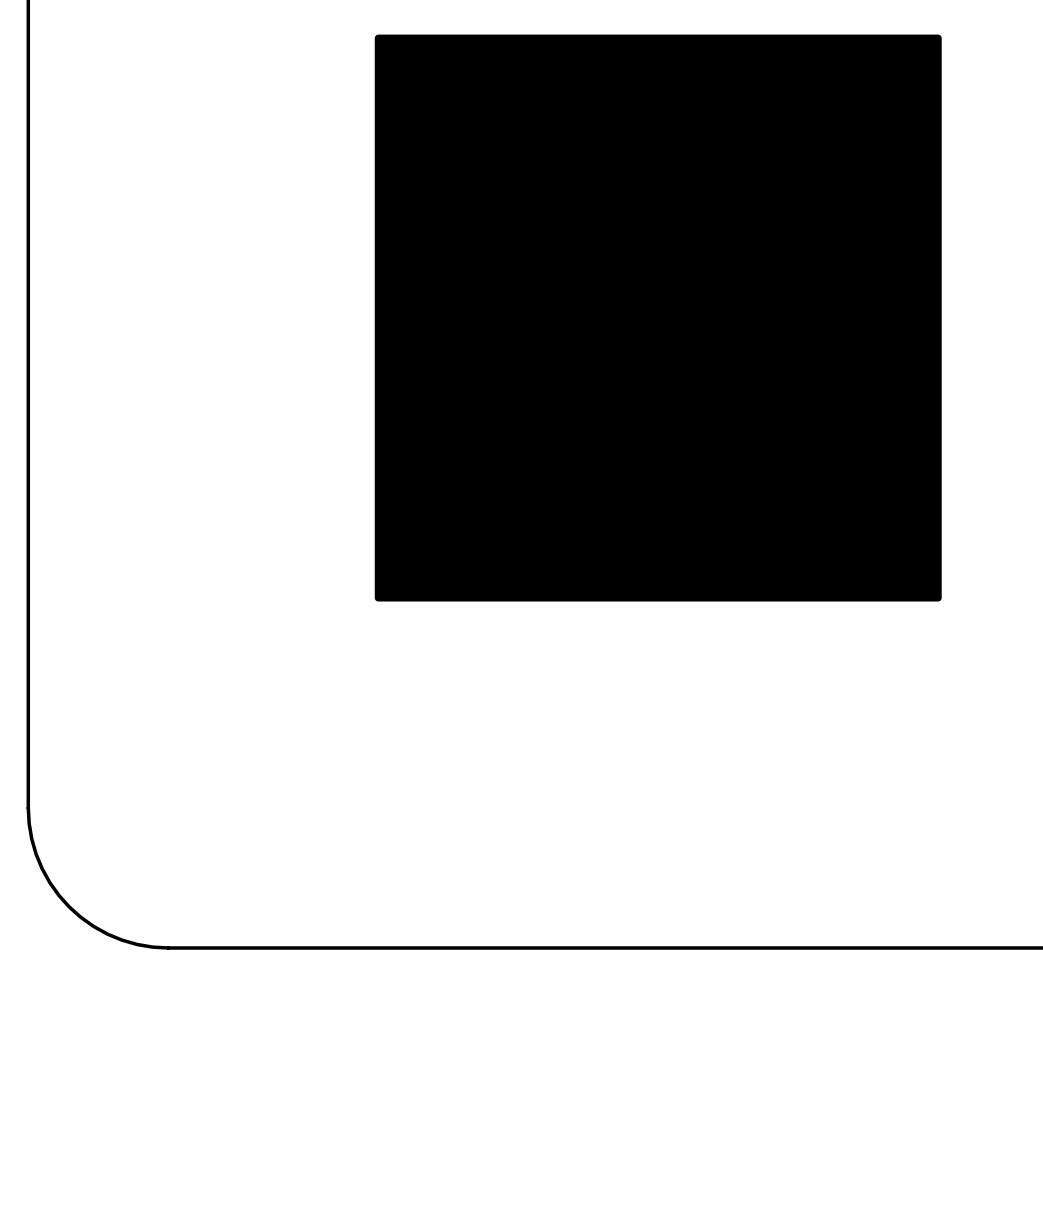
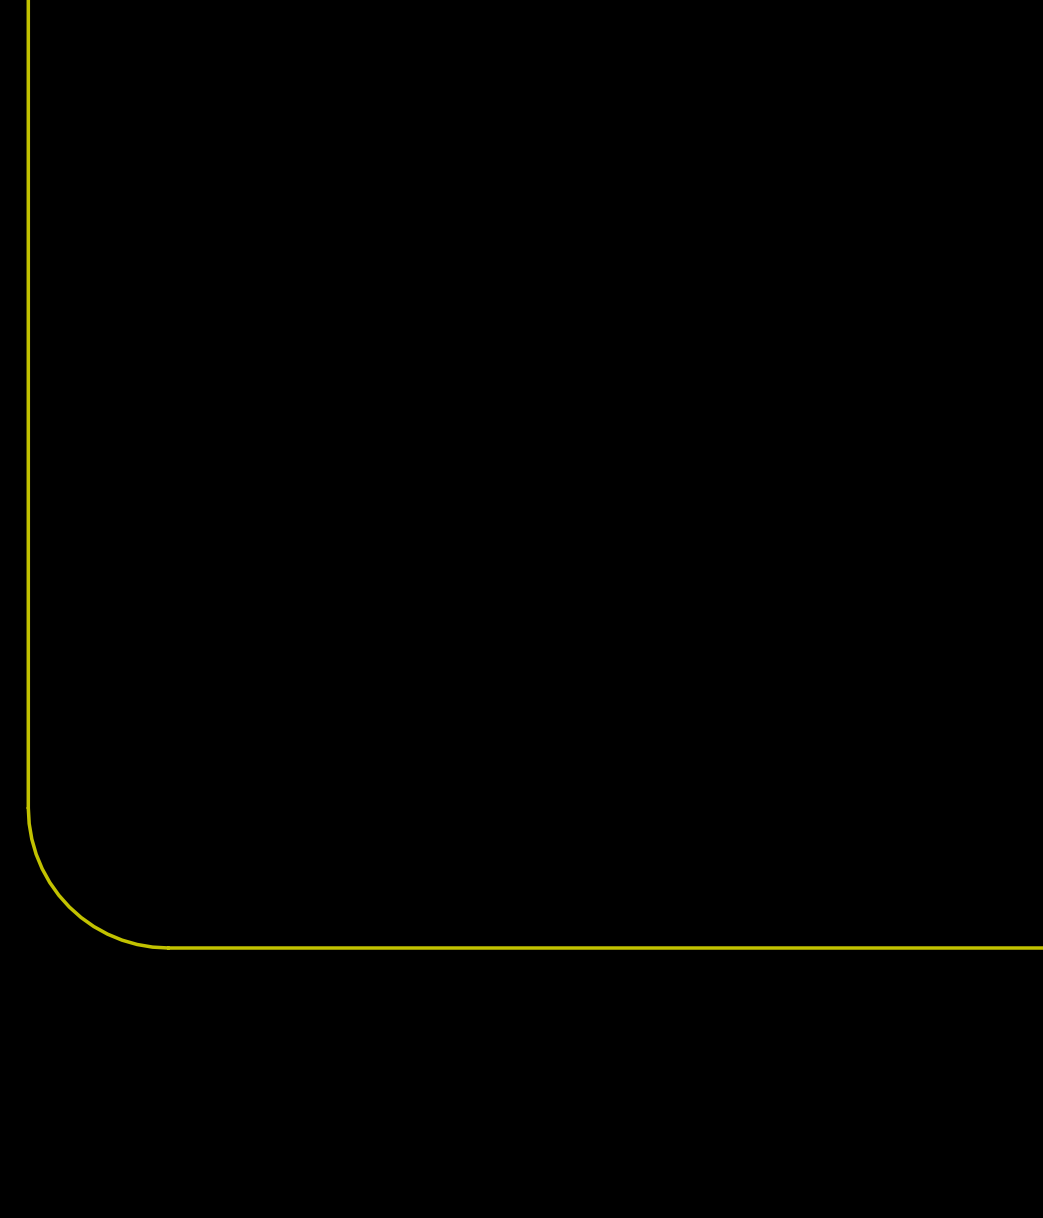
drawing: [374, 34, 942, 602] -> none

